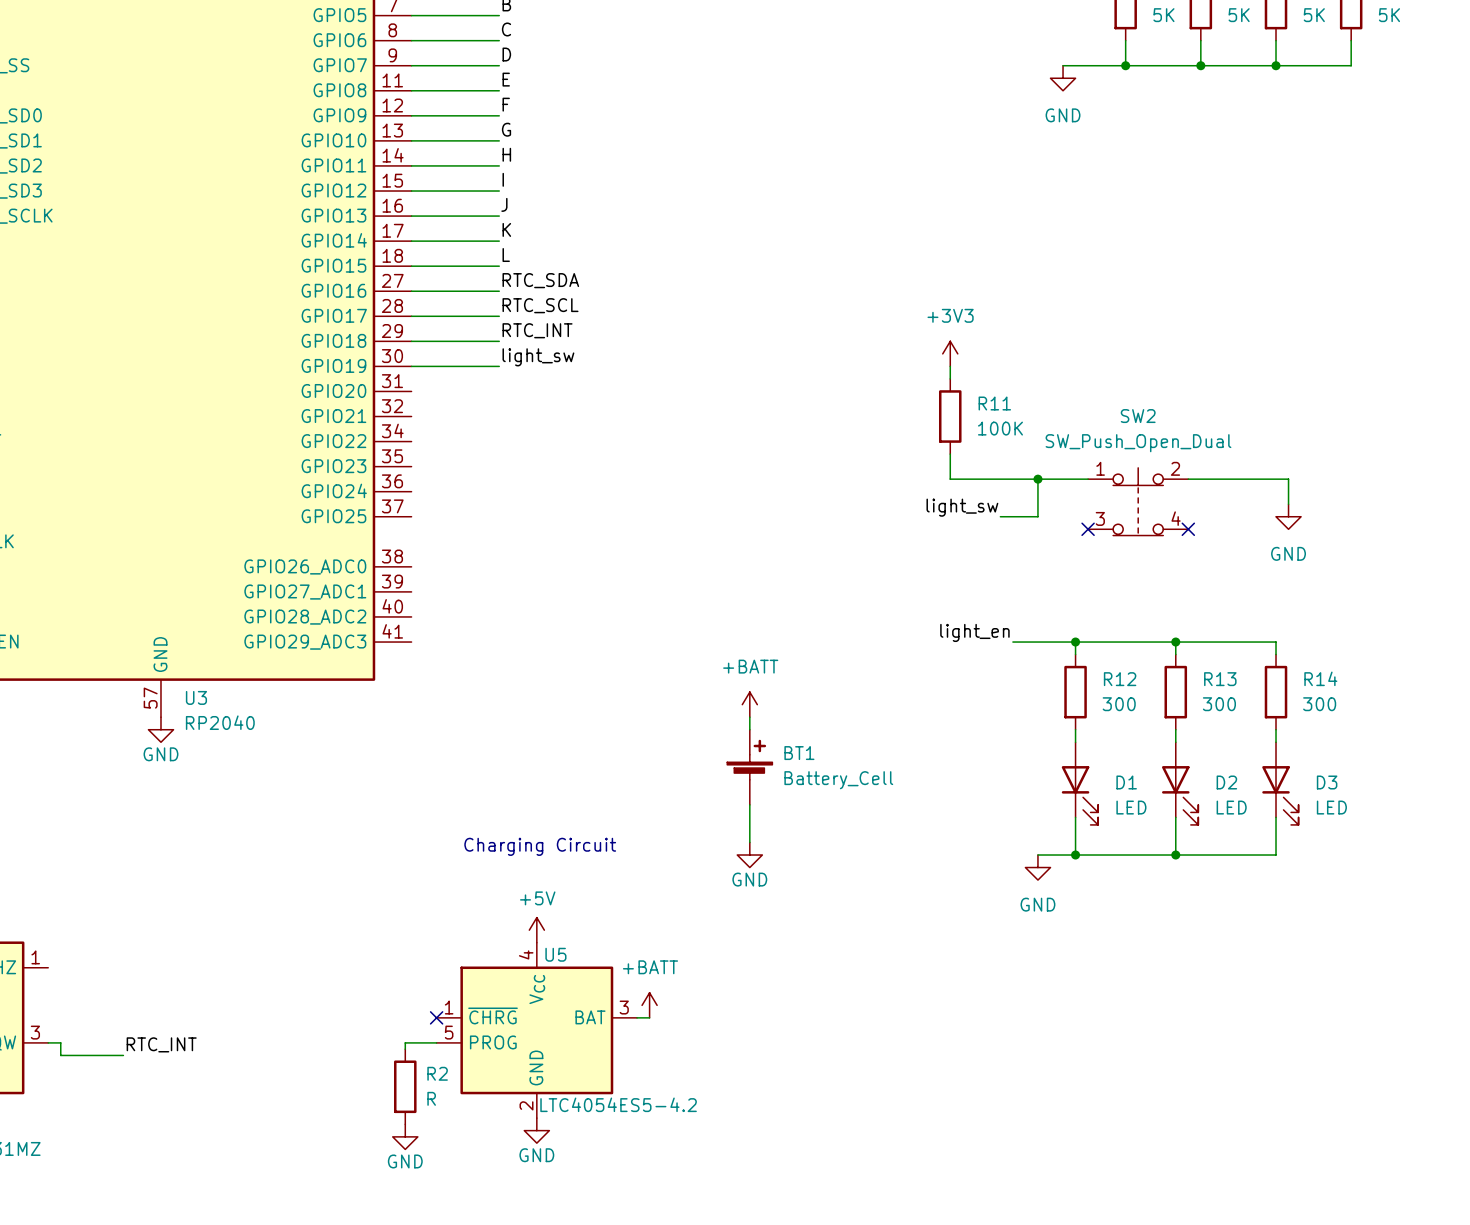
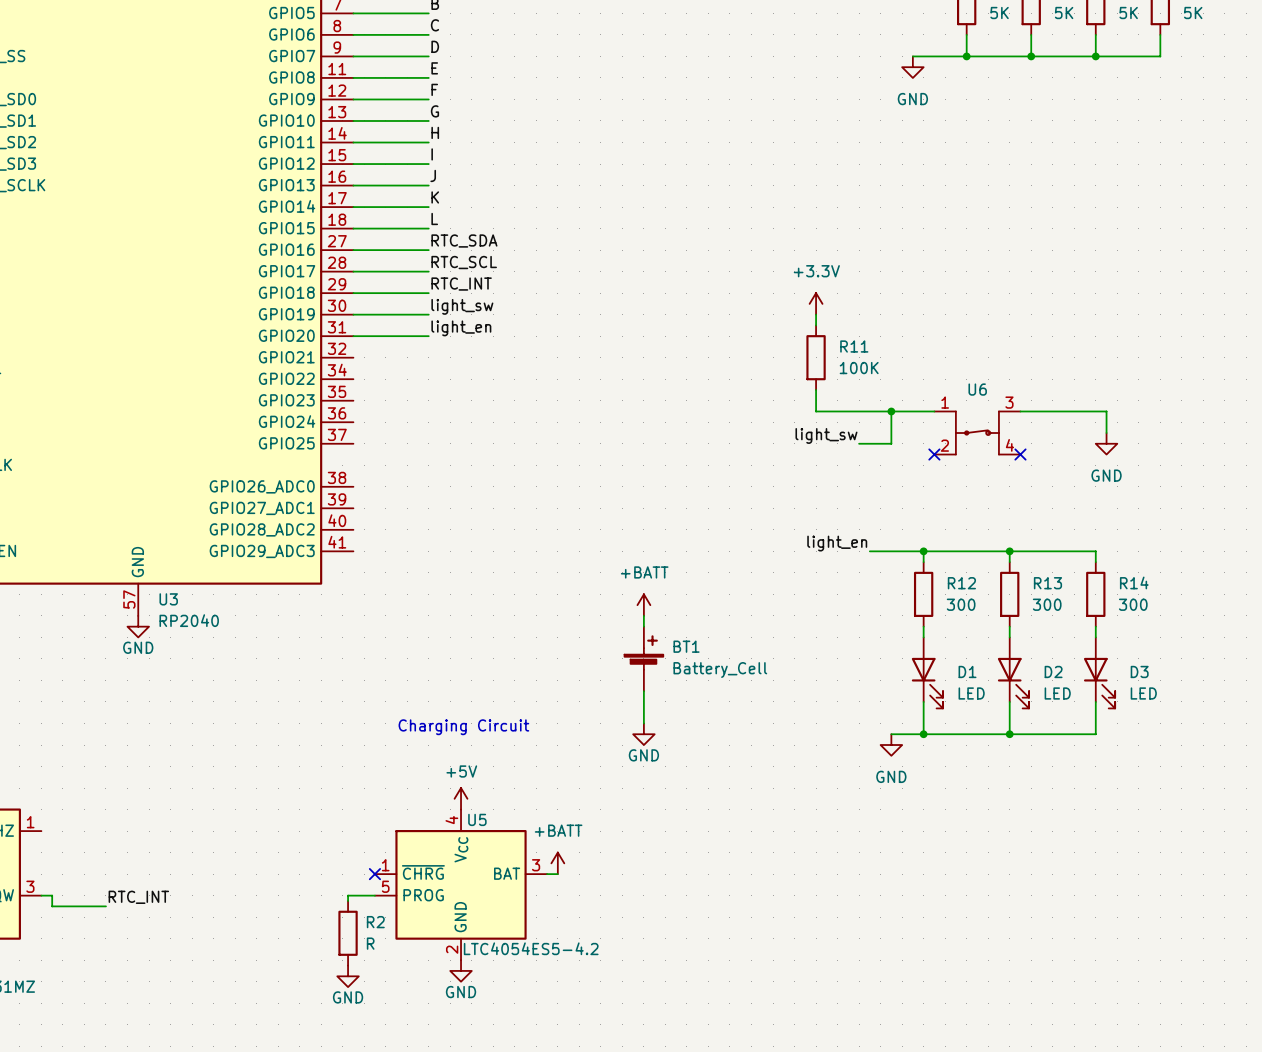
power symbol: +3V3 (950, 353) -> +3.3V (816, 303)
label: none -> light_en (461, 328)
wire: none -> (353, 336) (428, 336)
SW2: SW_Push_Open_Dual (1138, 501) -> none
U6: none -> (977, 433)

